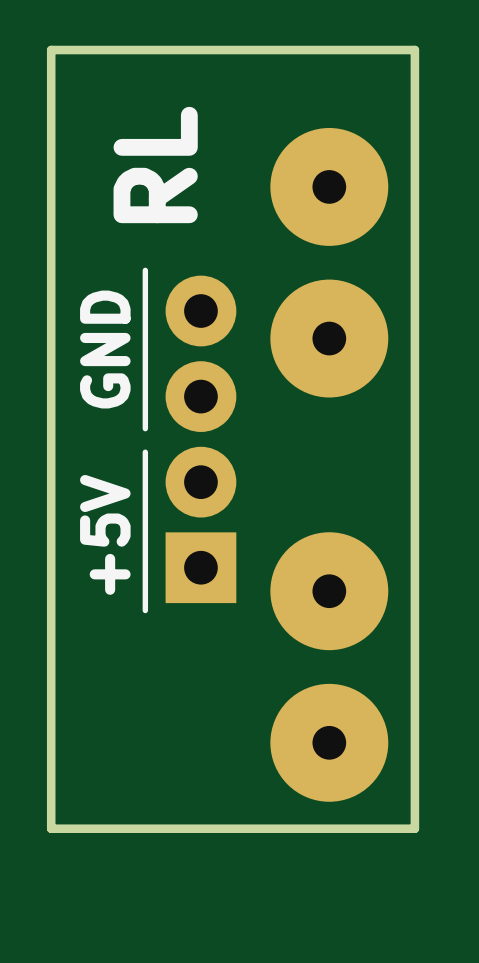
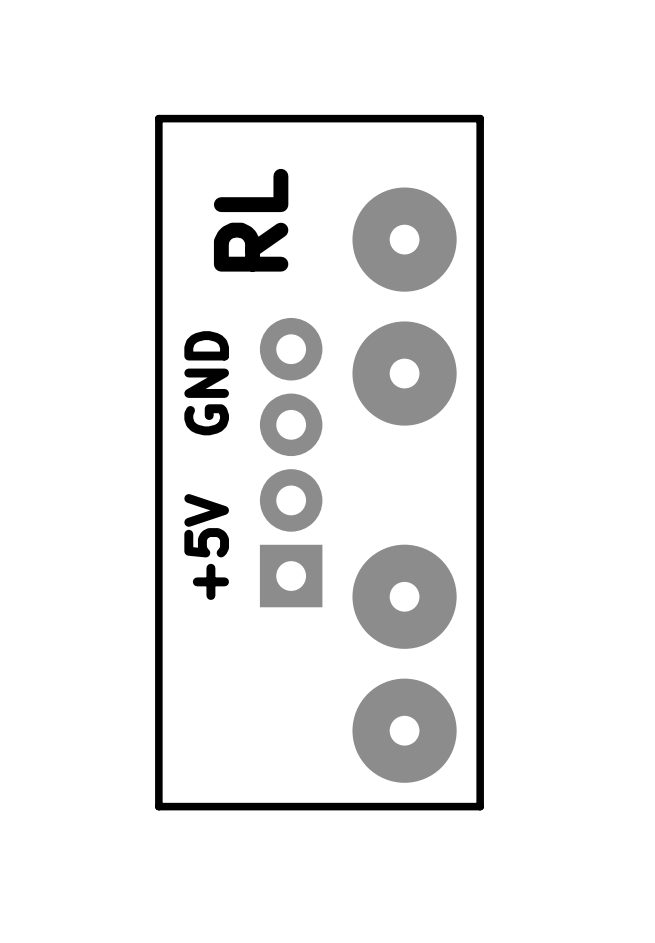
line: (145, 270) (145, 428) -> none
line: (145, 452) (145, 610) -> none

